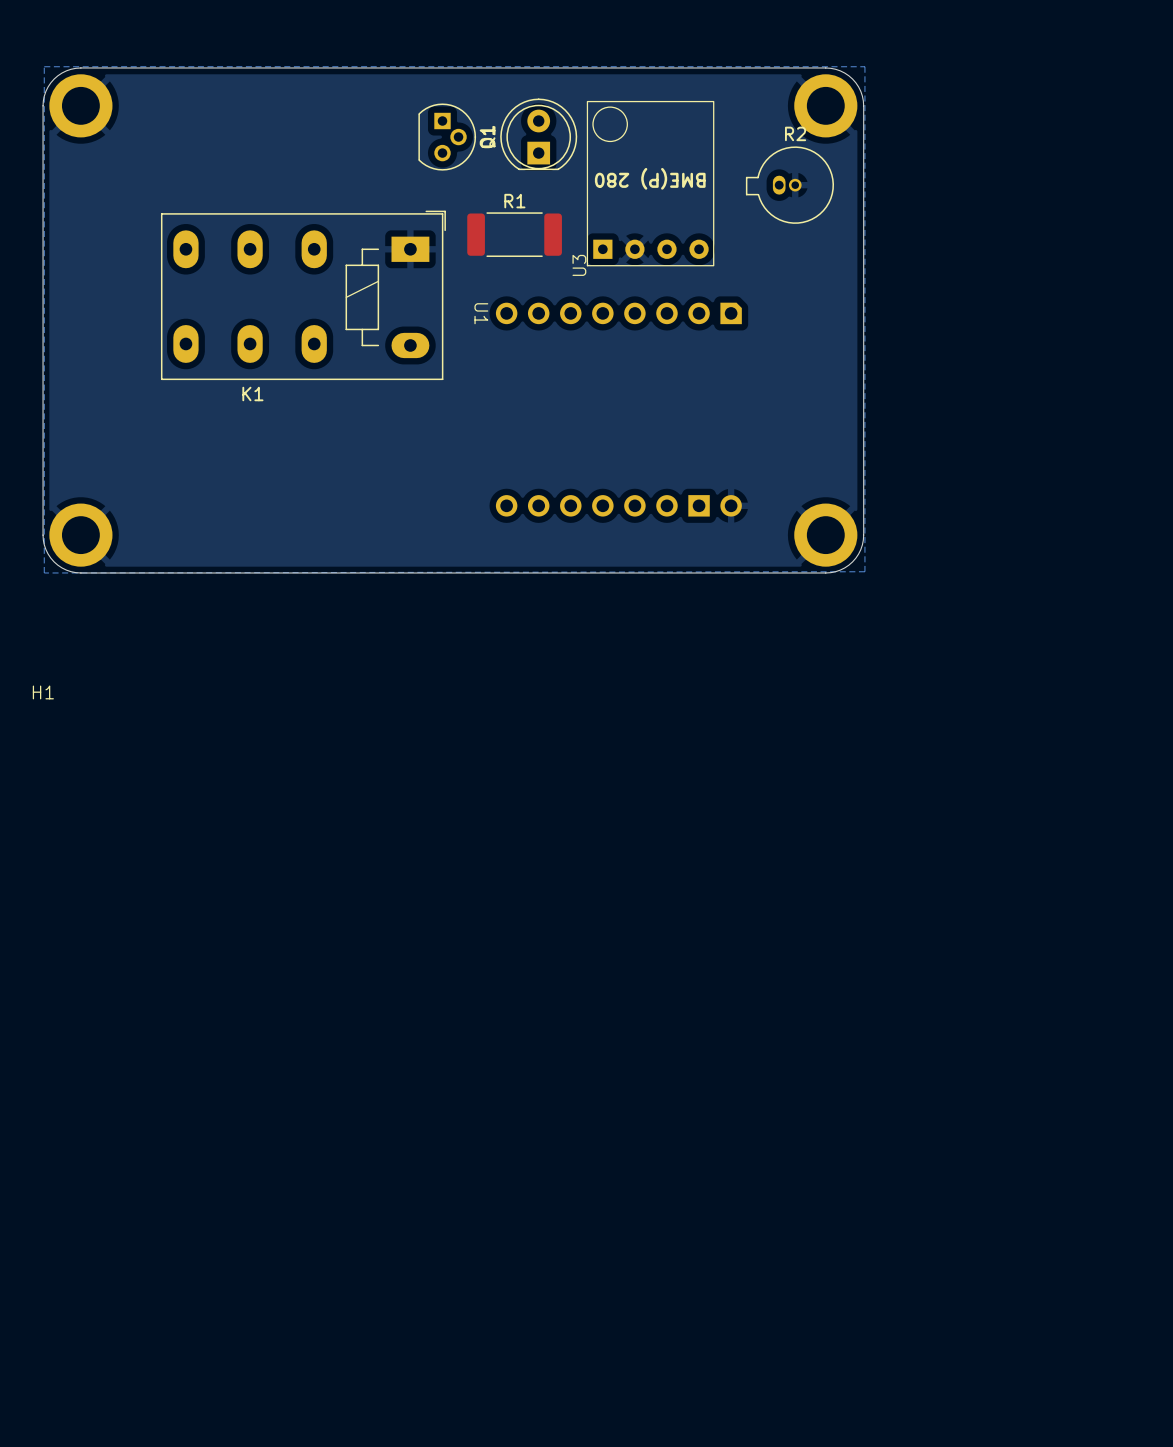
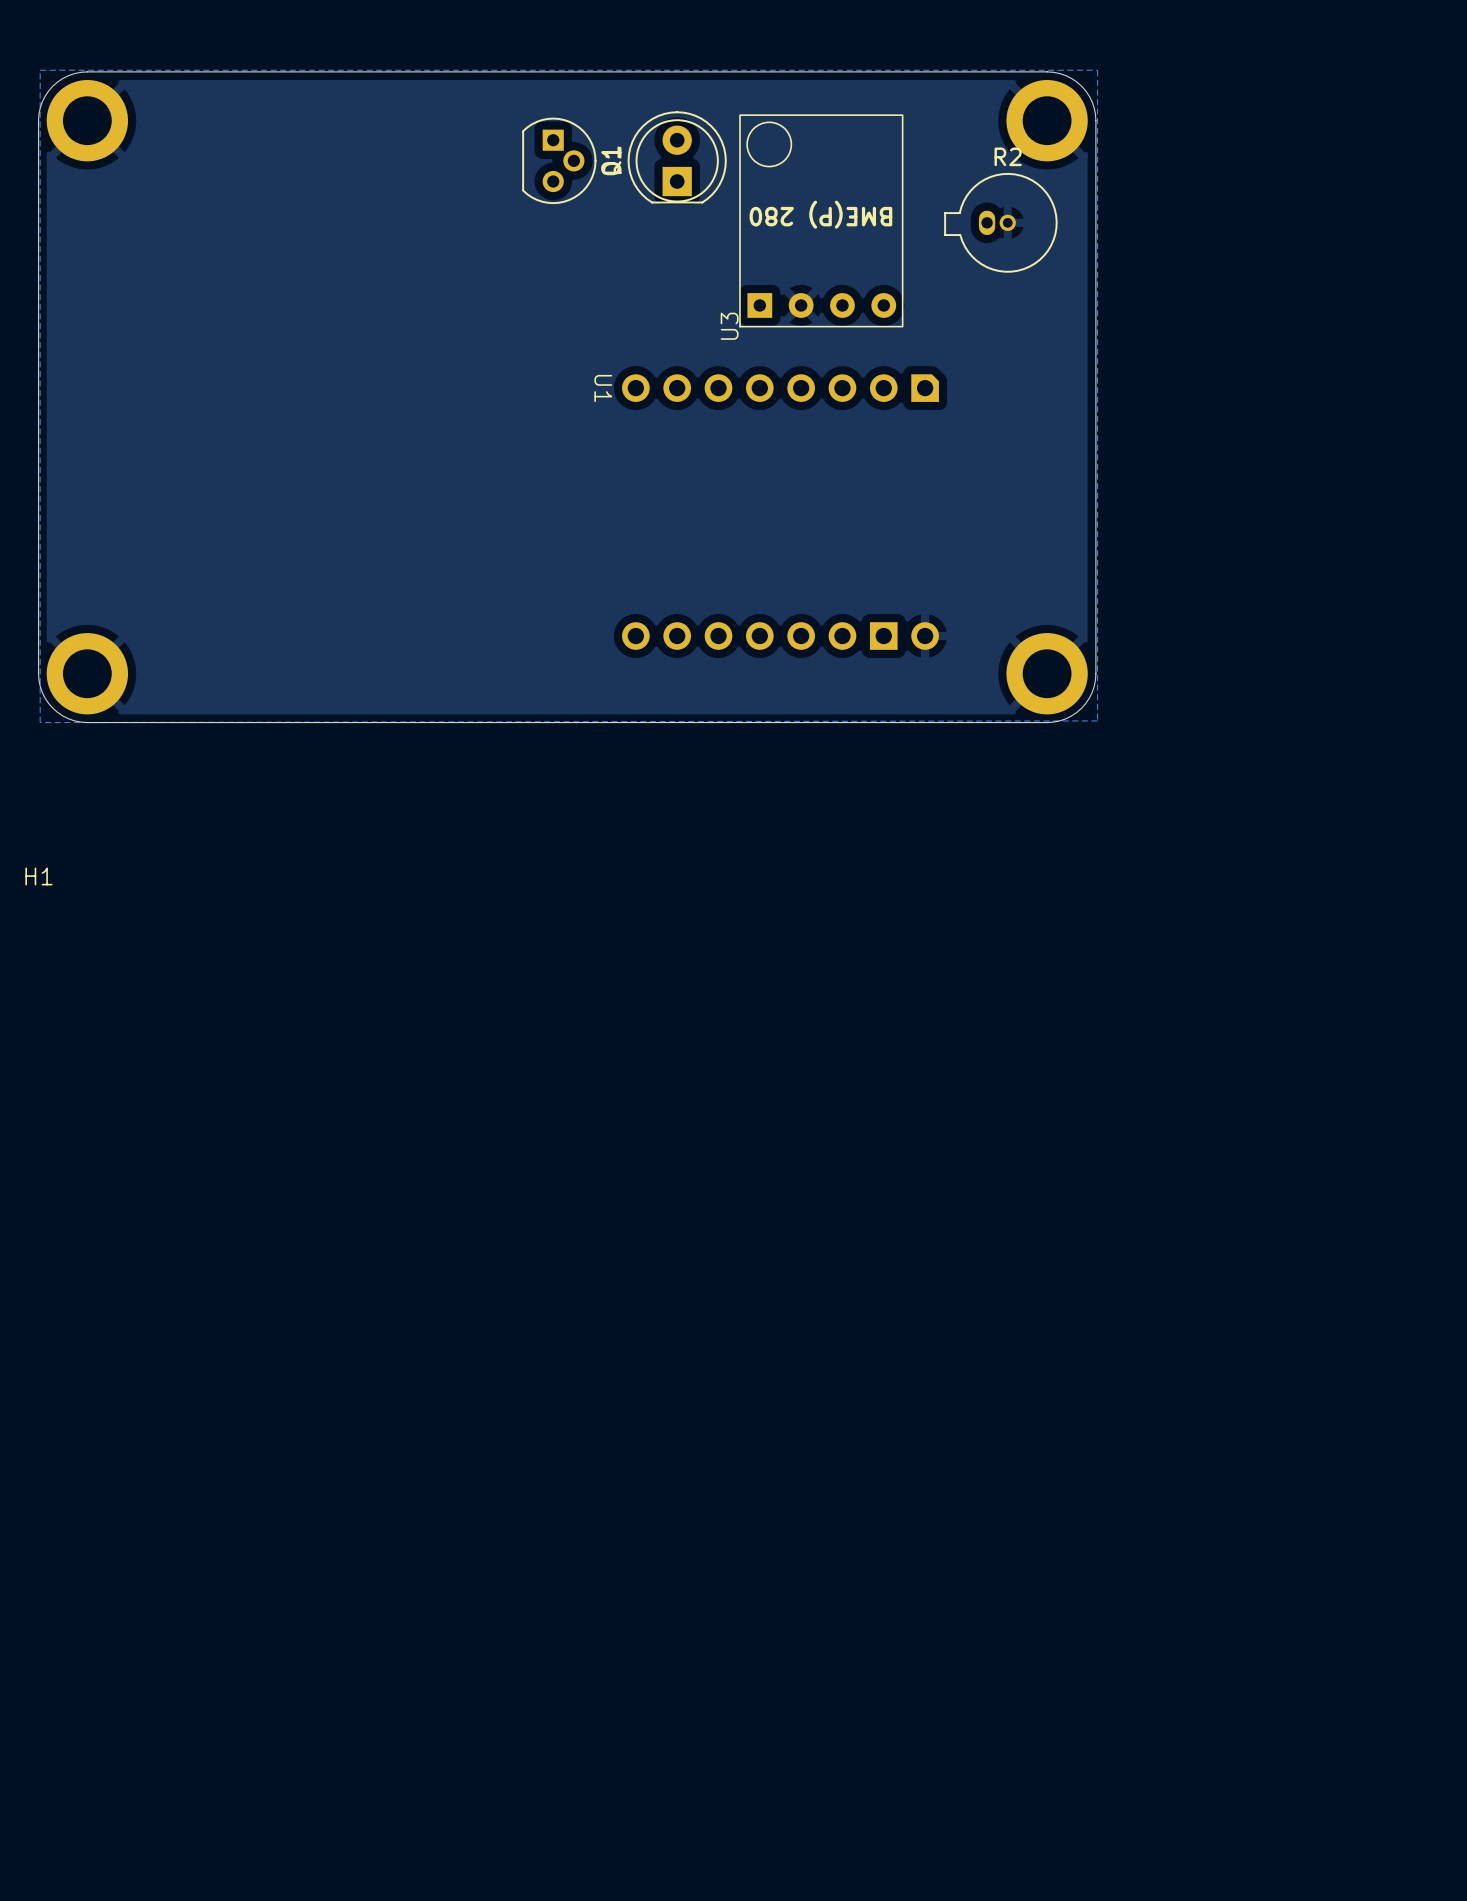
R1: (514, 234) -> none
K1: (303, 295) -> none

